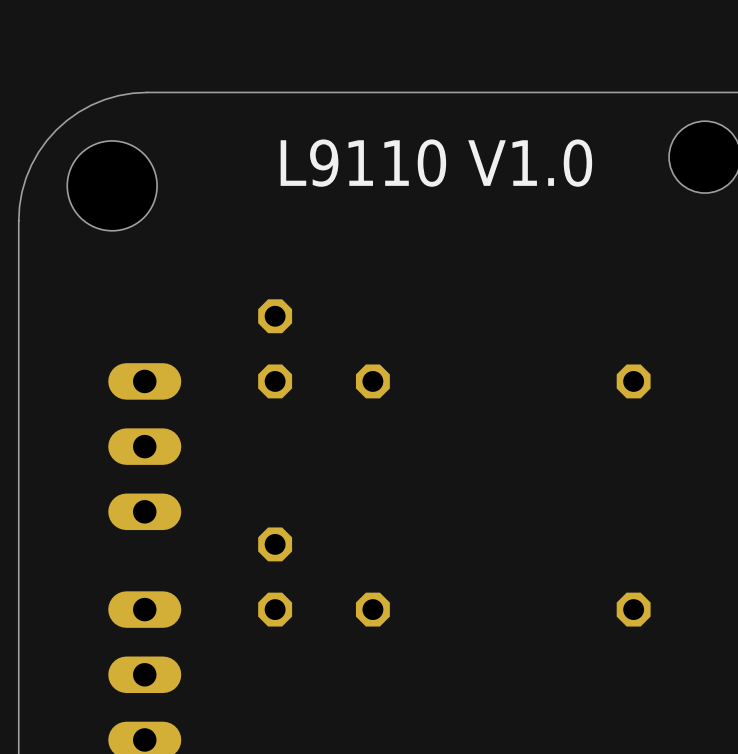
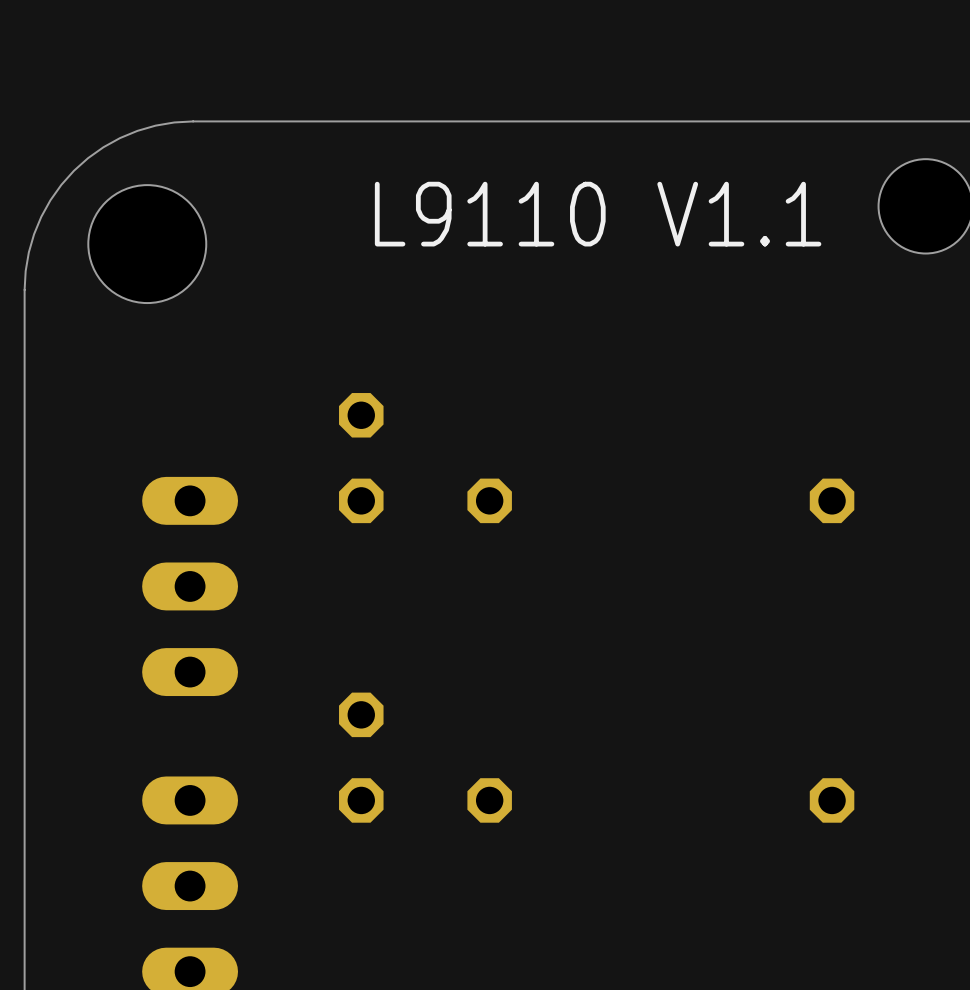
text: L9110 V1.0 (436, 163) -> L9110 V1.1 (598, 214)

